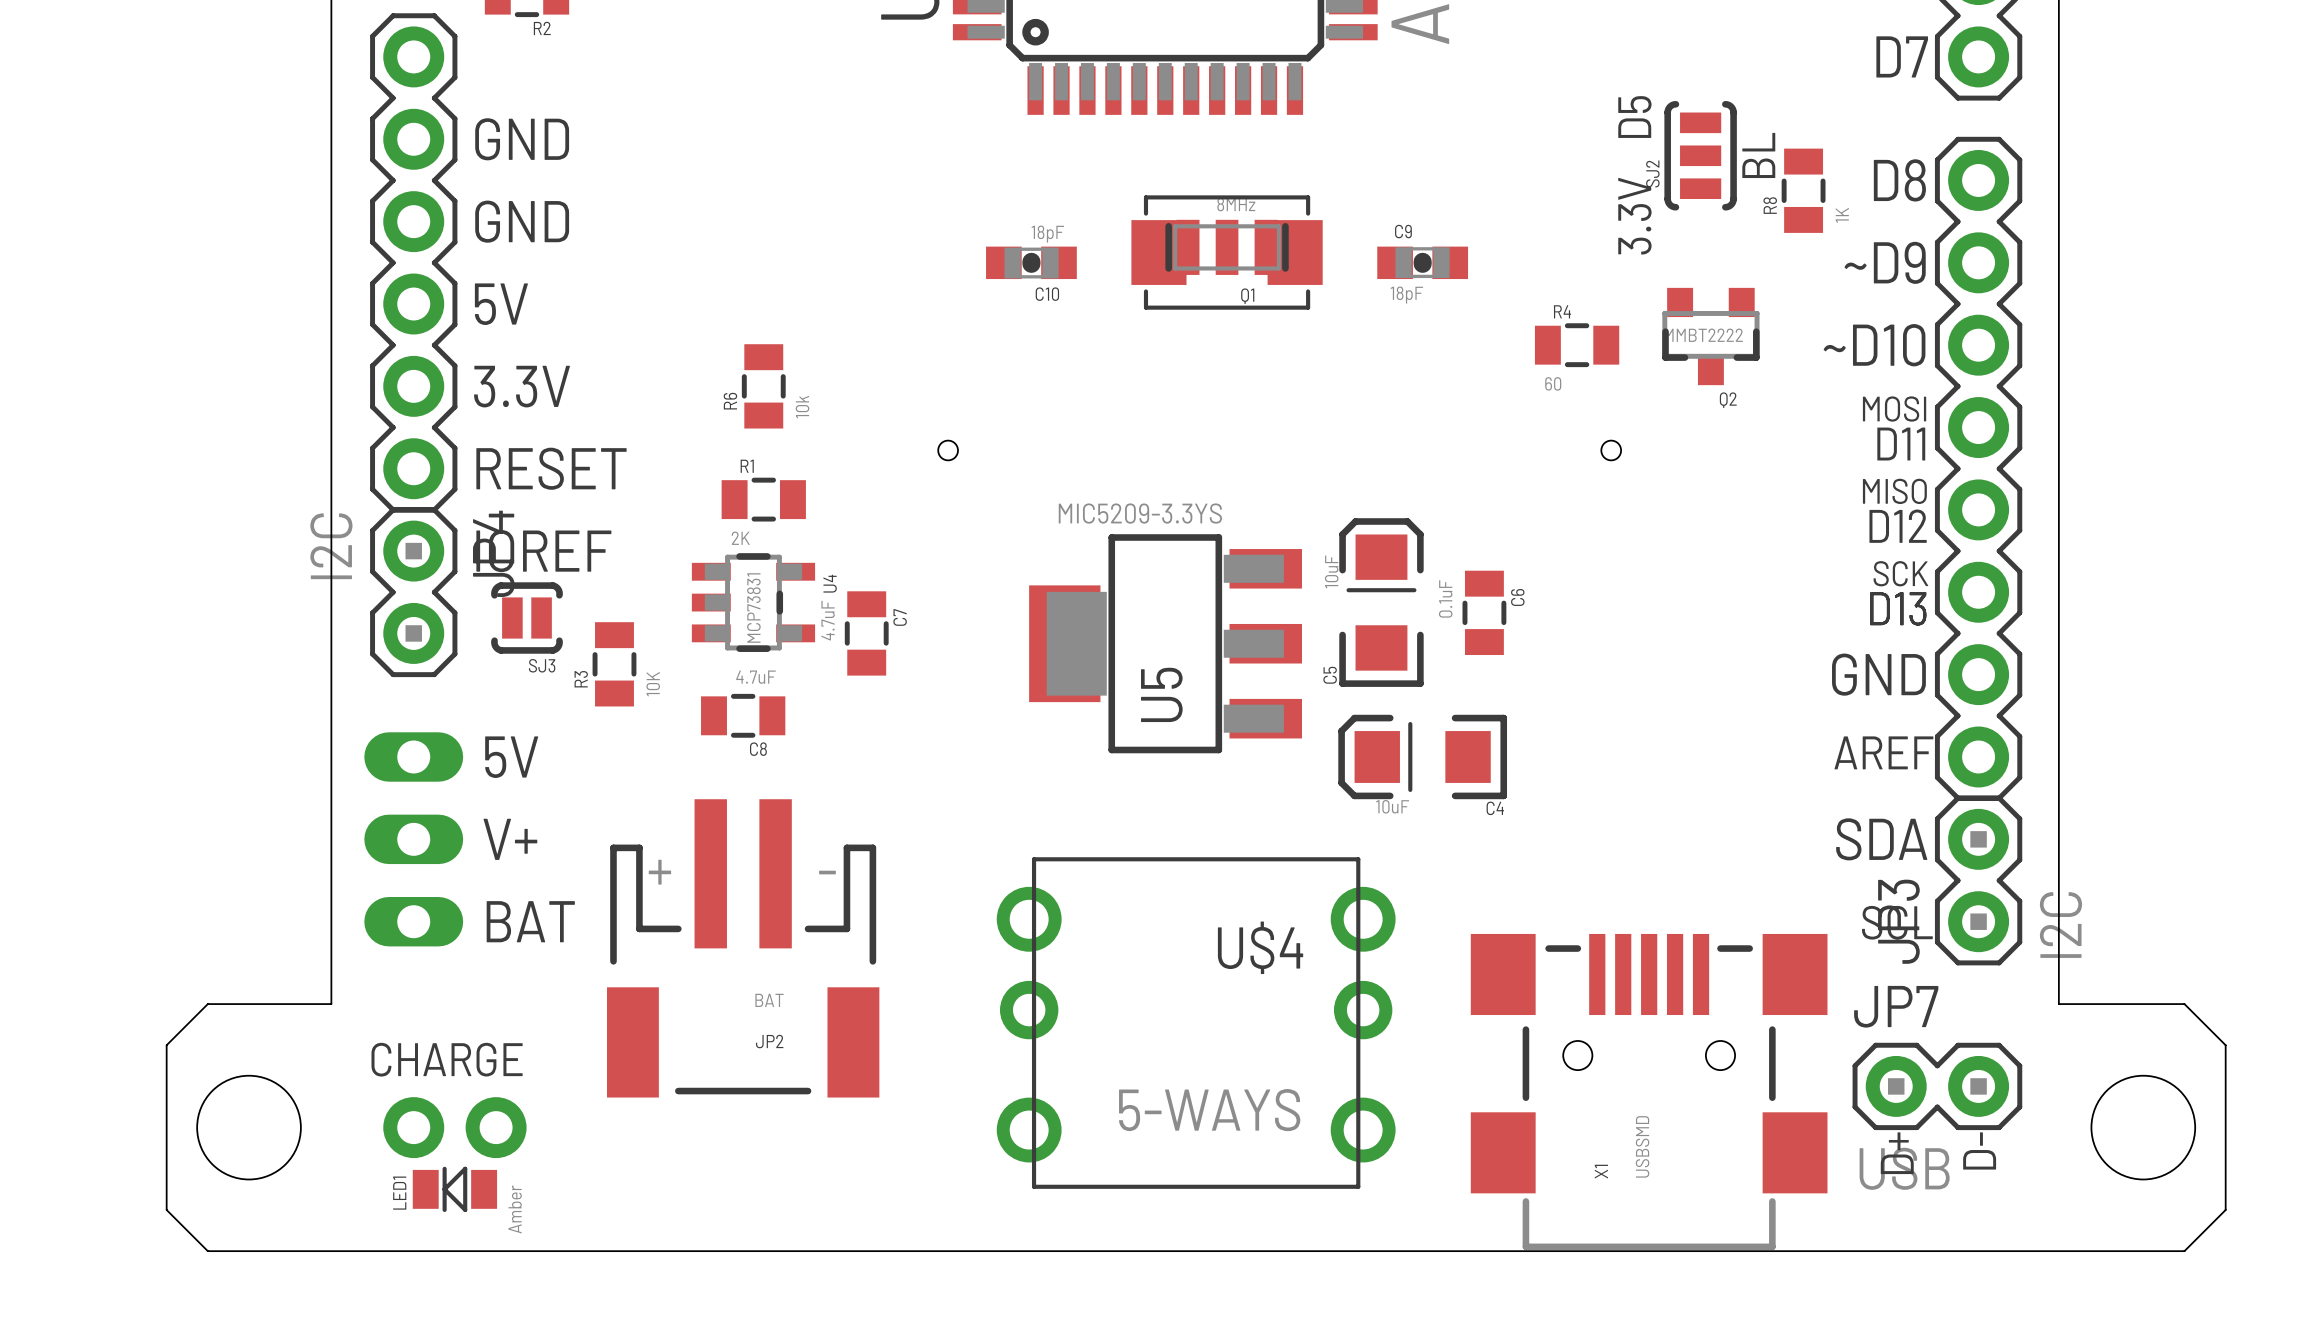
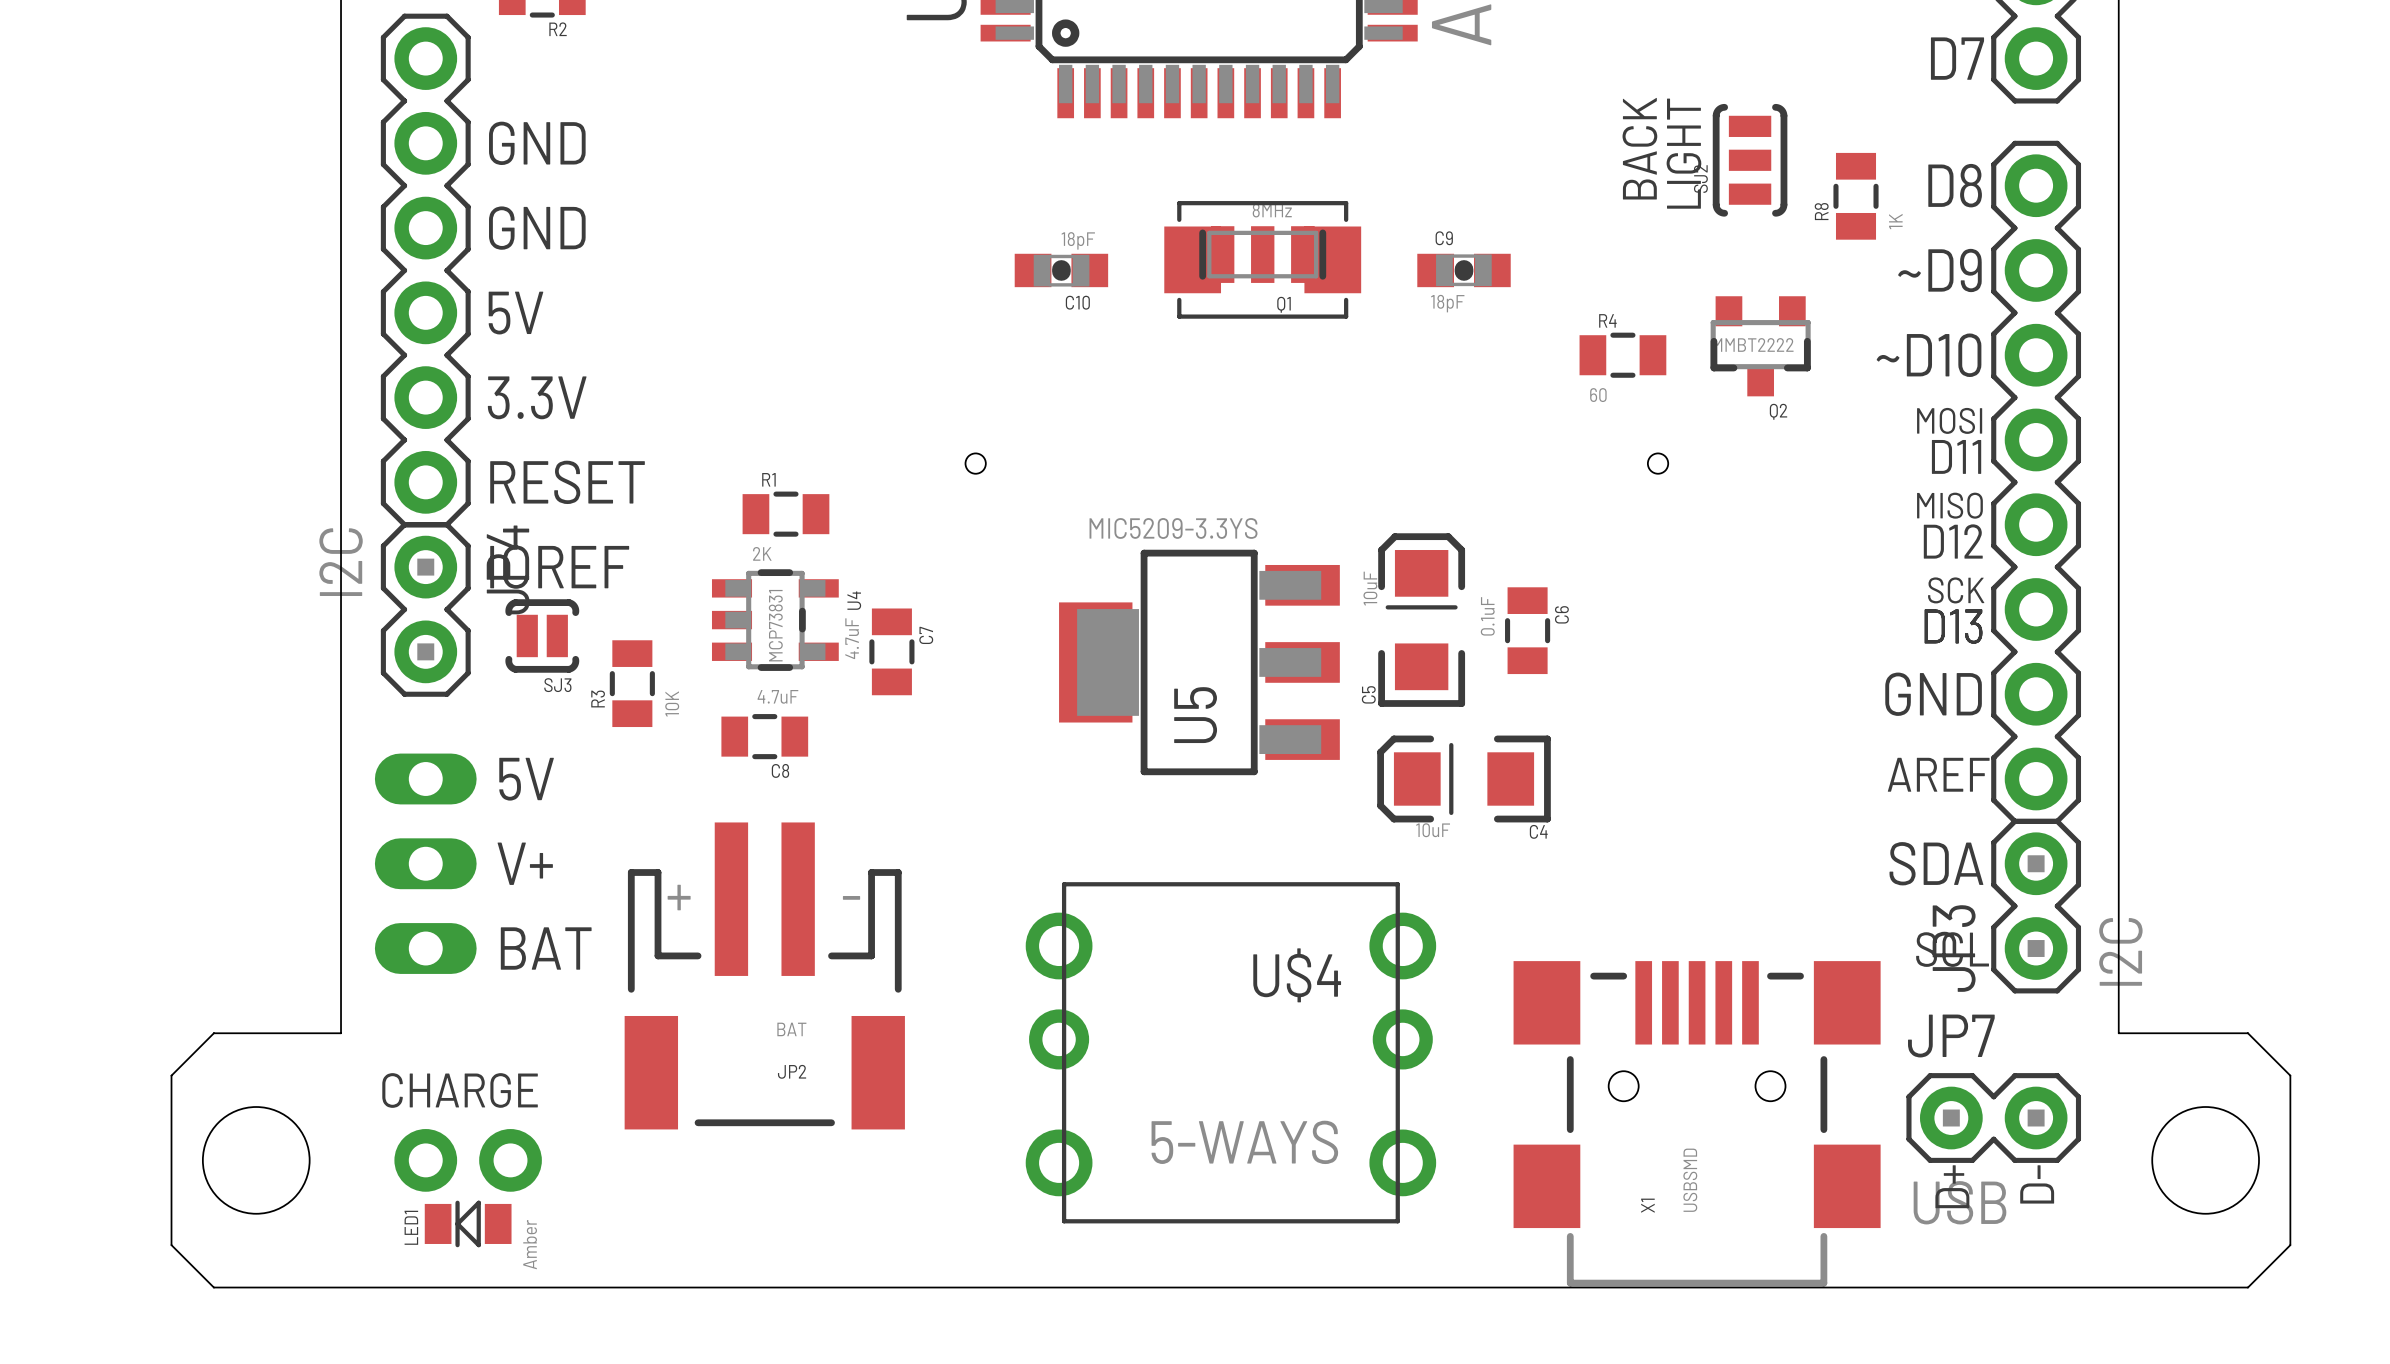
text: D5 (1634, 117) -> LIGHT (1683, 153)
text: none -> BACK (1639, 148)
text: BL (1758, 155) -> none
text: 3.3V (1634, 216) -> none
R6: 10k (763, 386) -> none

